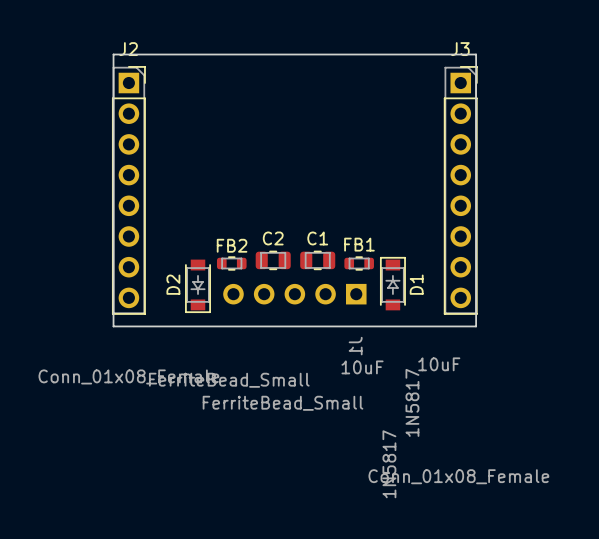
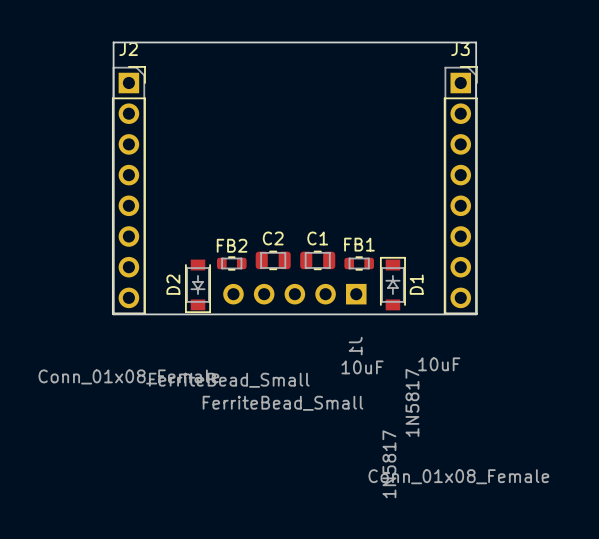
board edge: (476, 54) (113, 54) (113, 326) (476, 326) (476, 314) -> (476, 54) (476, 42) (113, 42) (113, 314) (476, 314)

